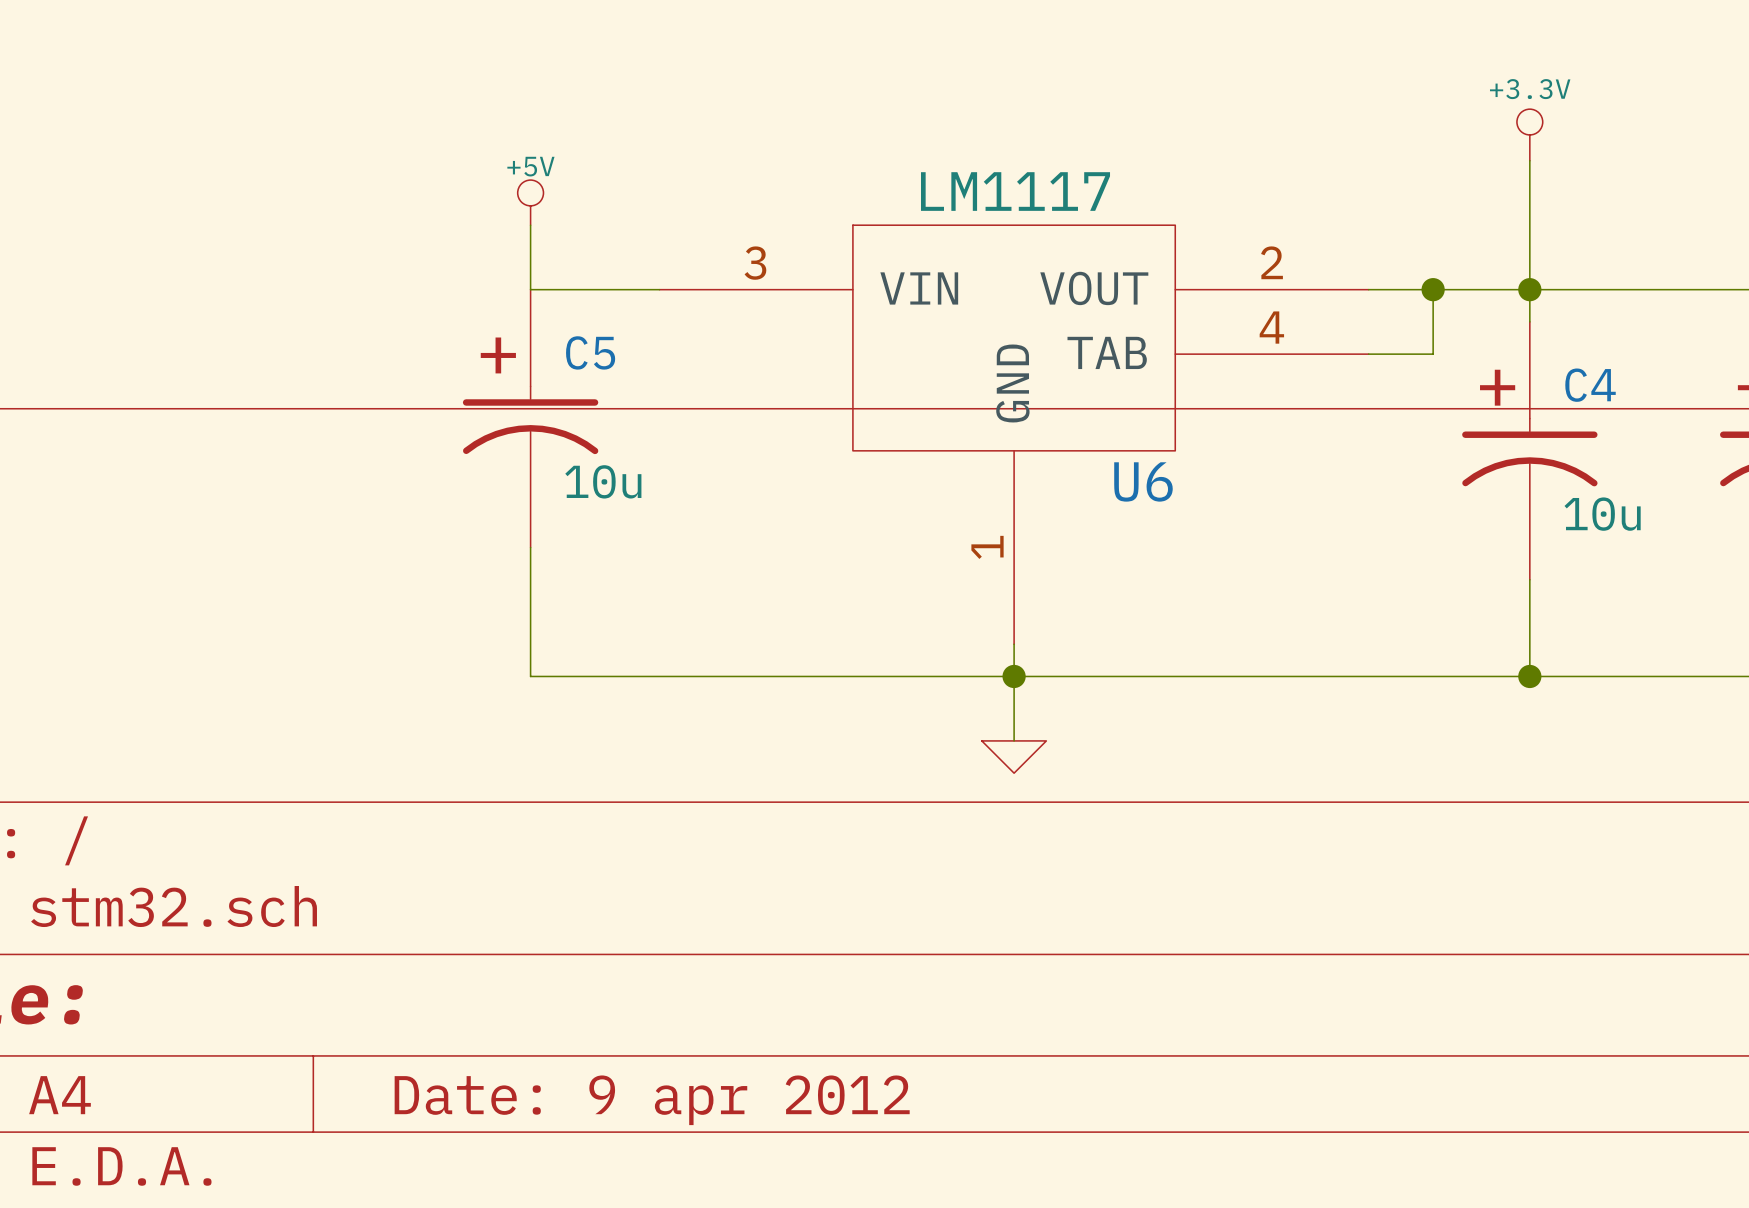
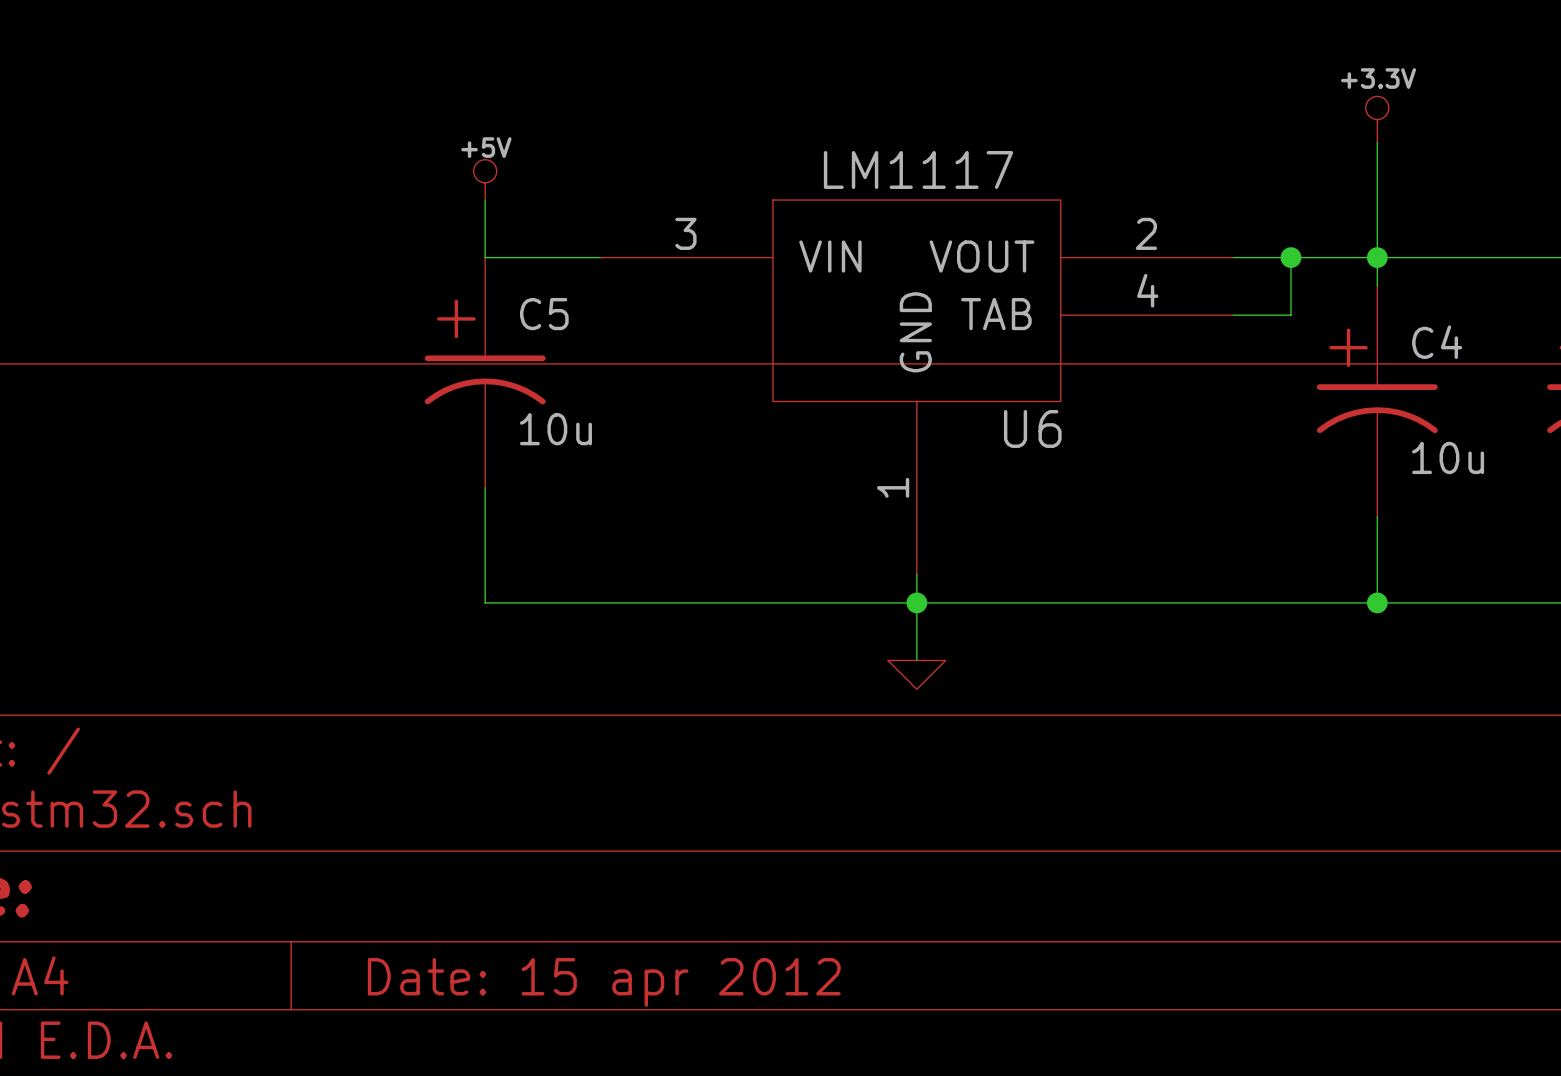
title block: Date: 9 apr 2012 (652, 1100) -> Date: 15 apr 2012 (604, 982)

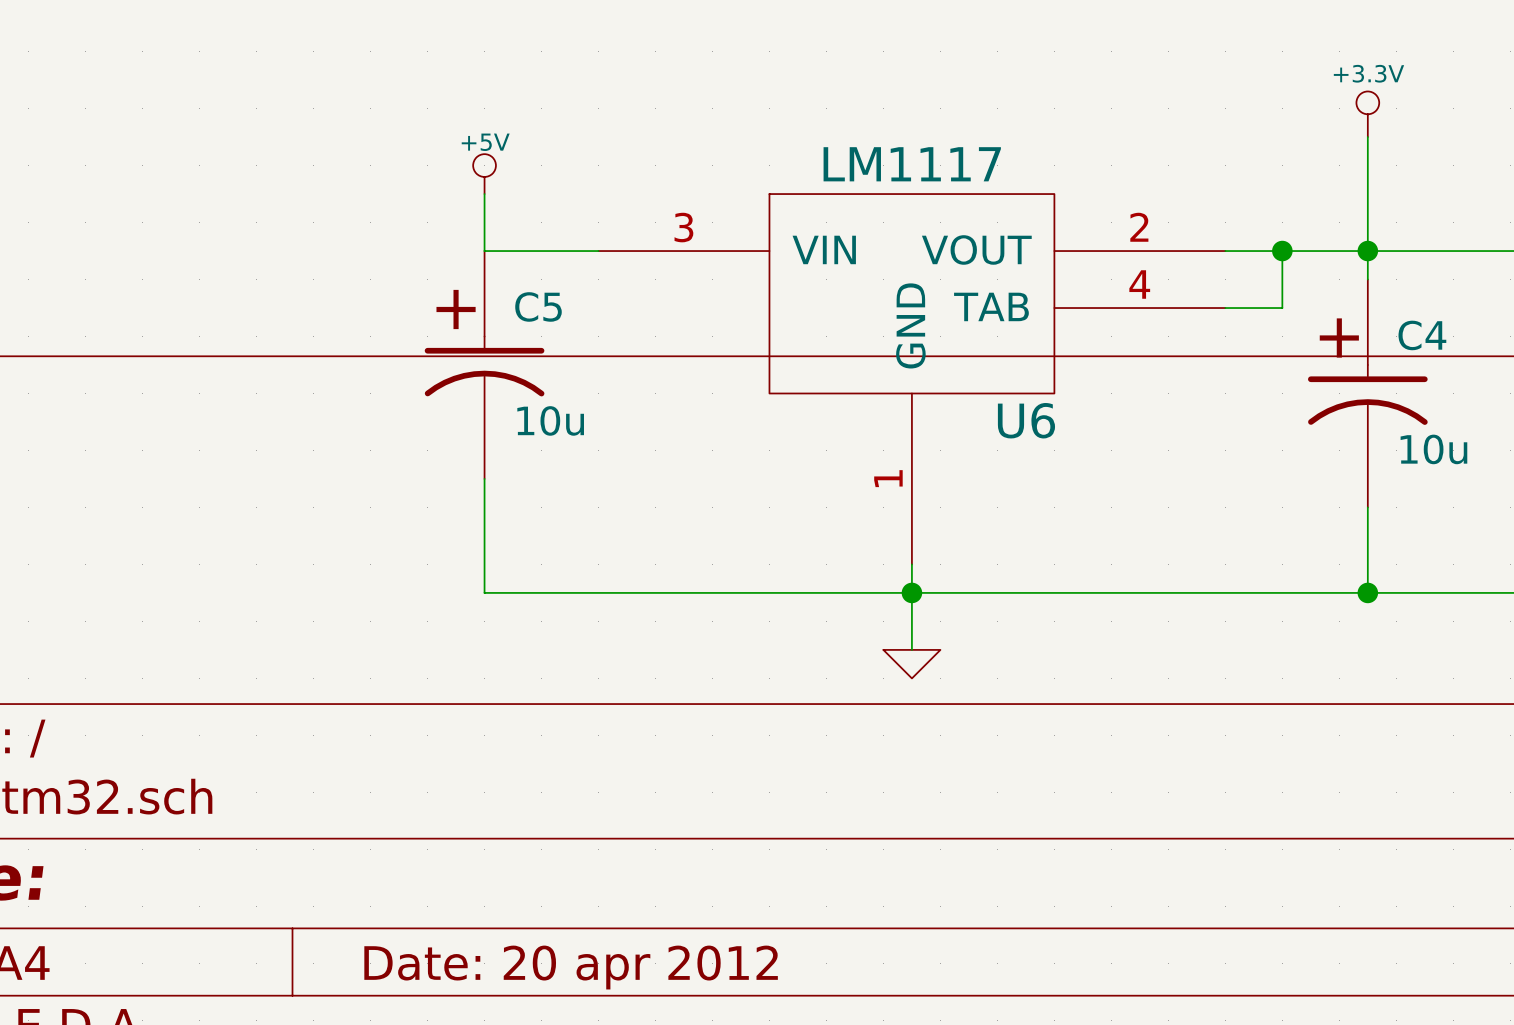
title block: Date: 15 apr 2012 (604, 982) -> Date: 20 apr 2012 (571, 967)

